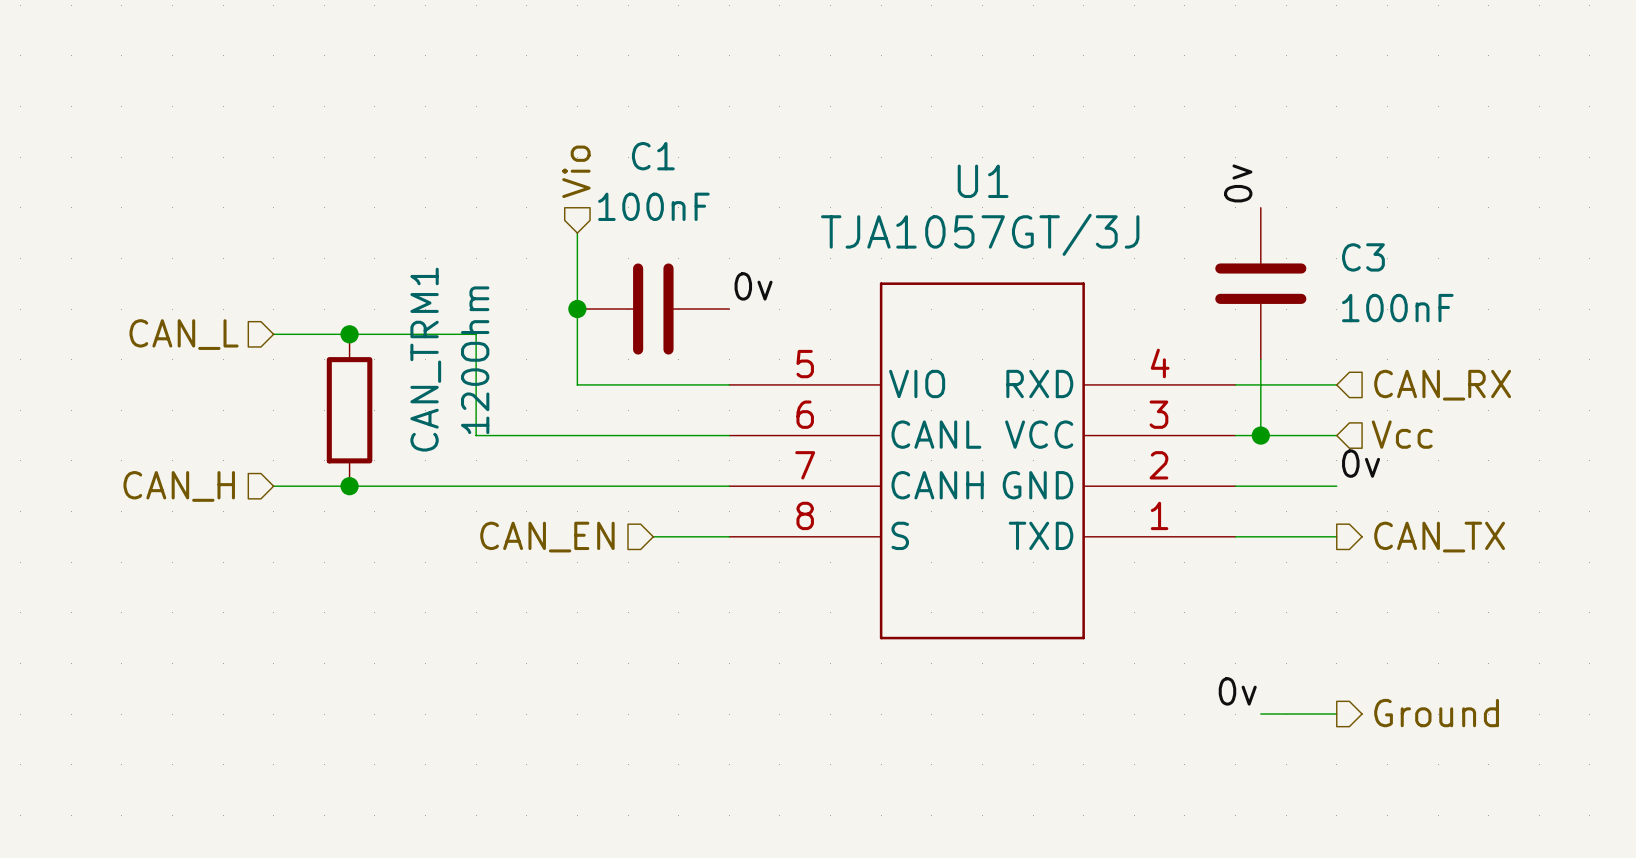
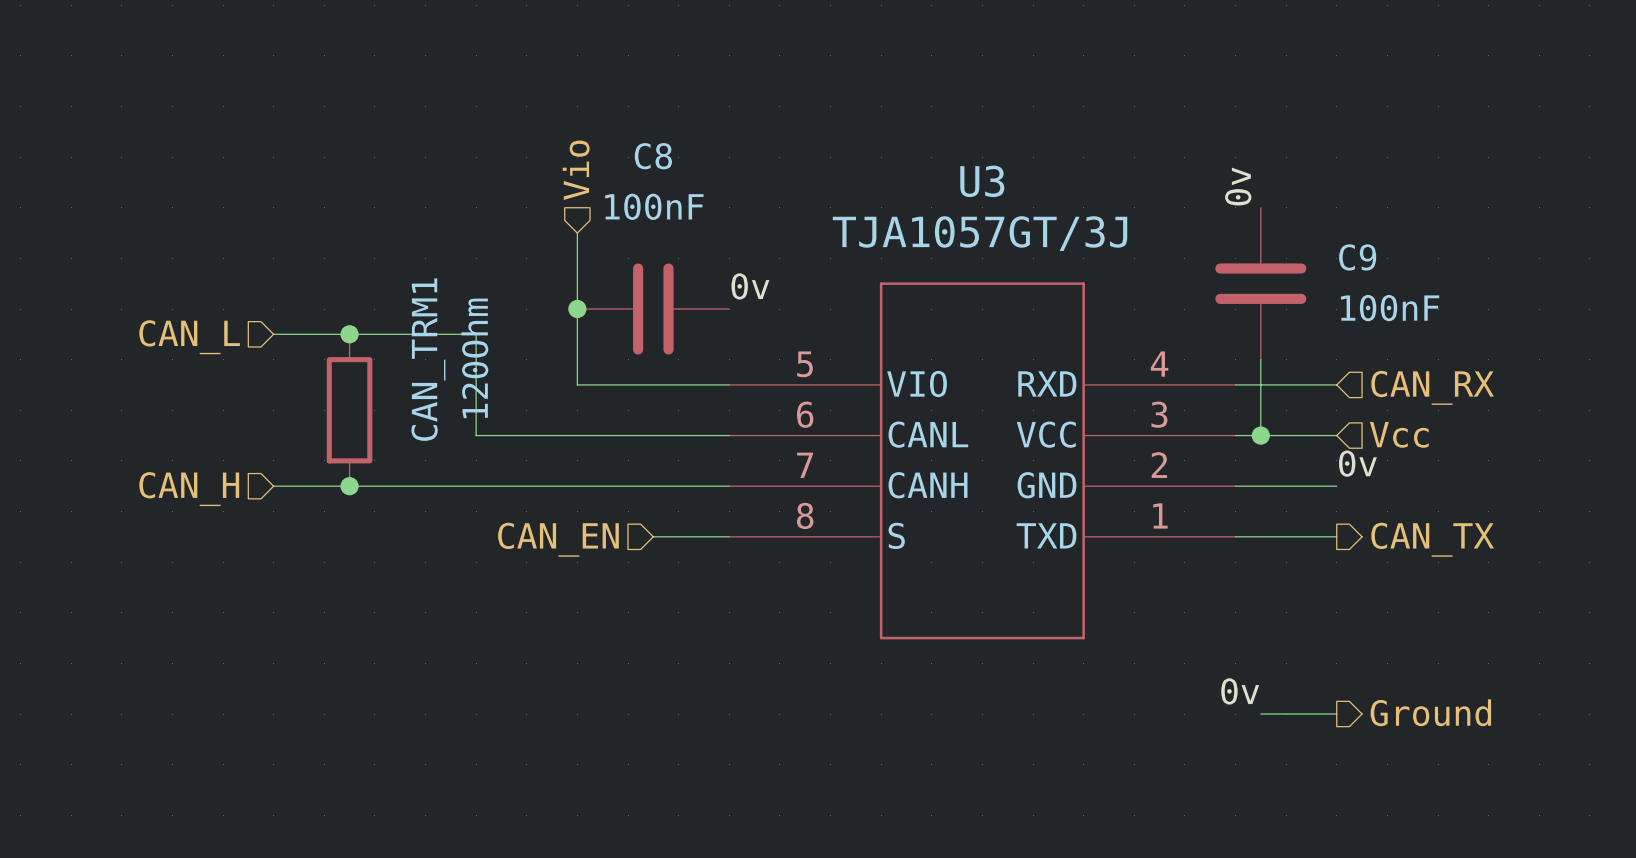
C1 name: C1 (653, 156) -> C8 (653, 156)
U1 name: U1 (983, 181) -> U3 (982, 181)
C3 name: C3 (1363, 257) -> C9 (1357, 257)

